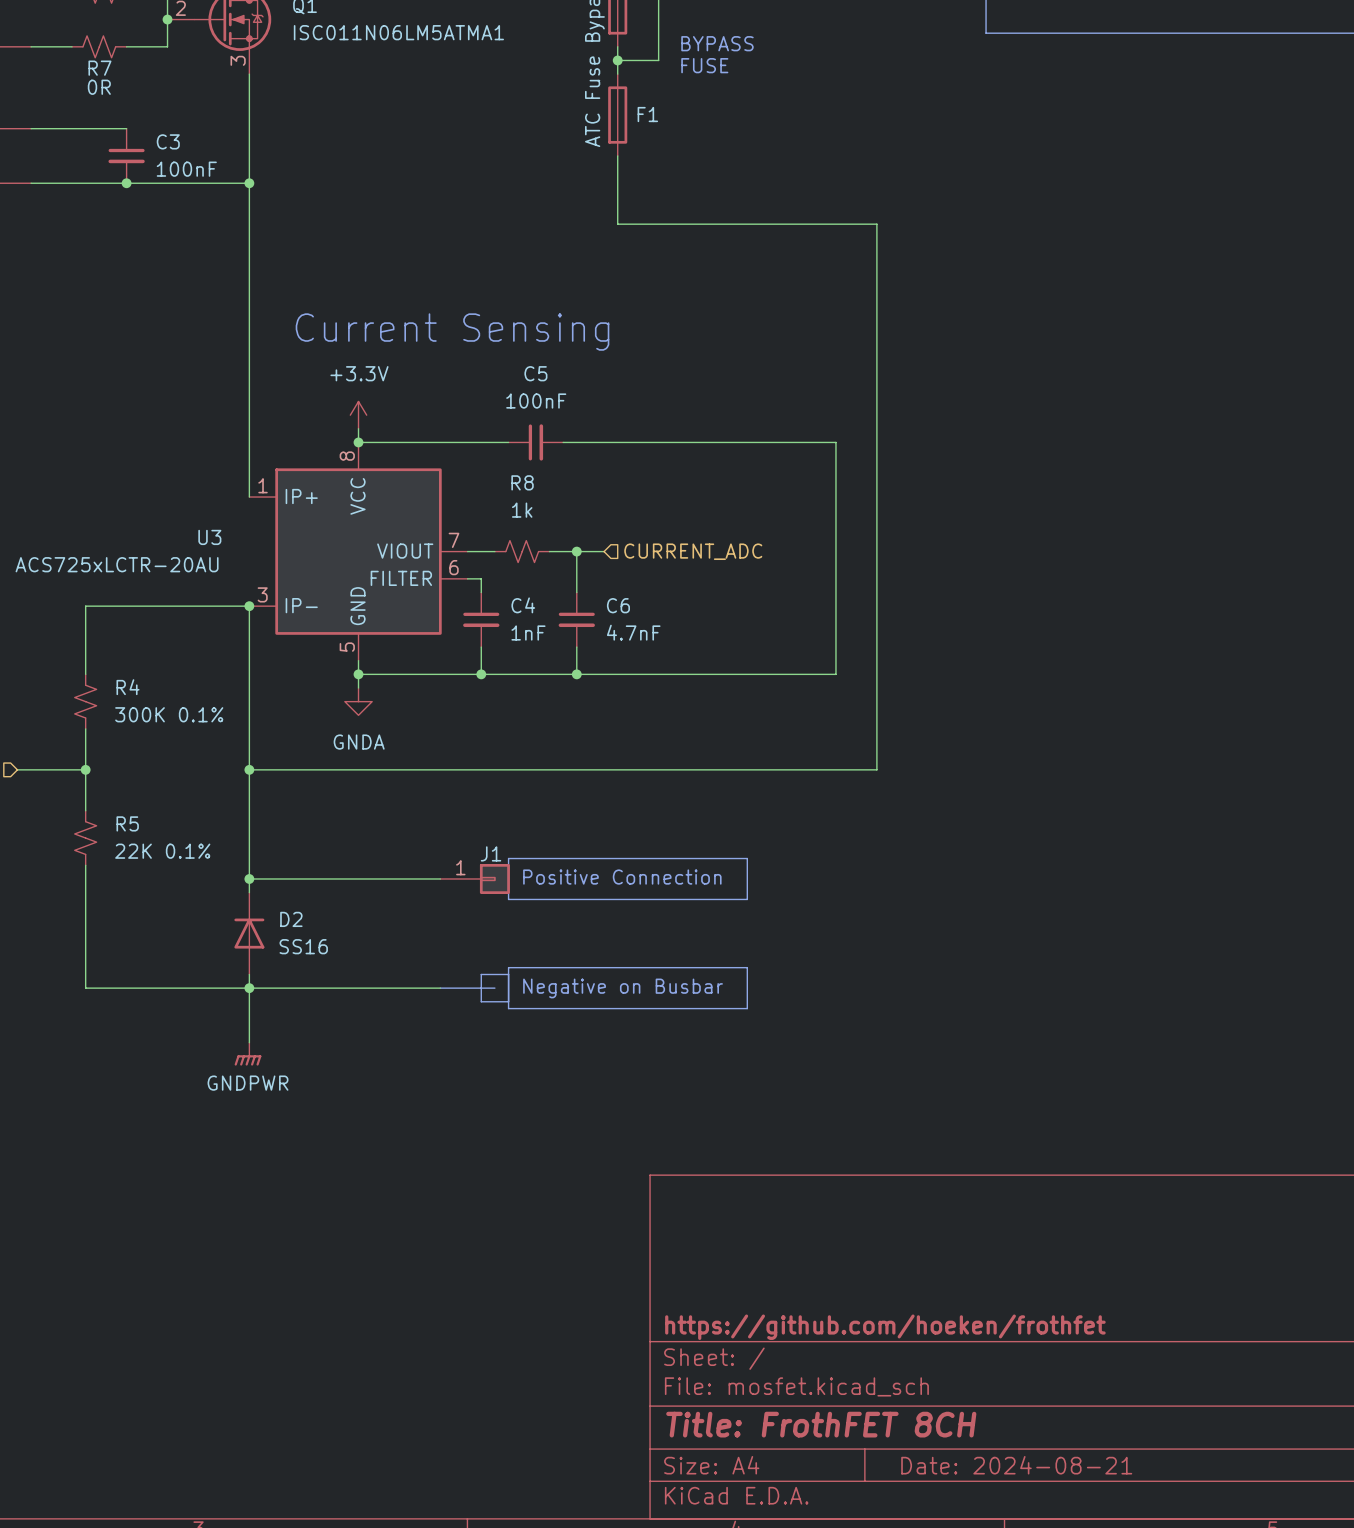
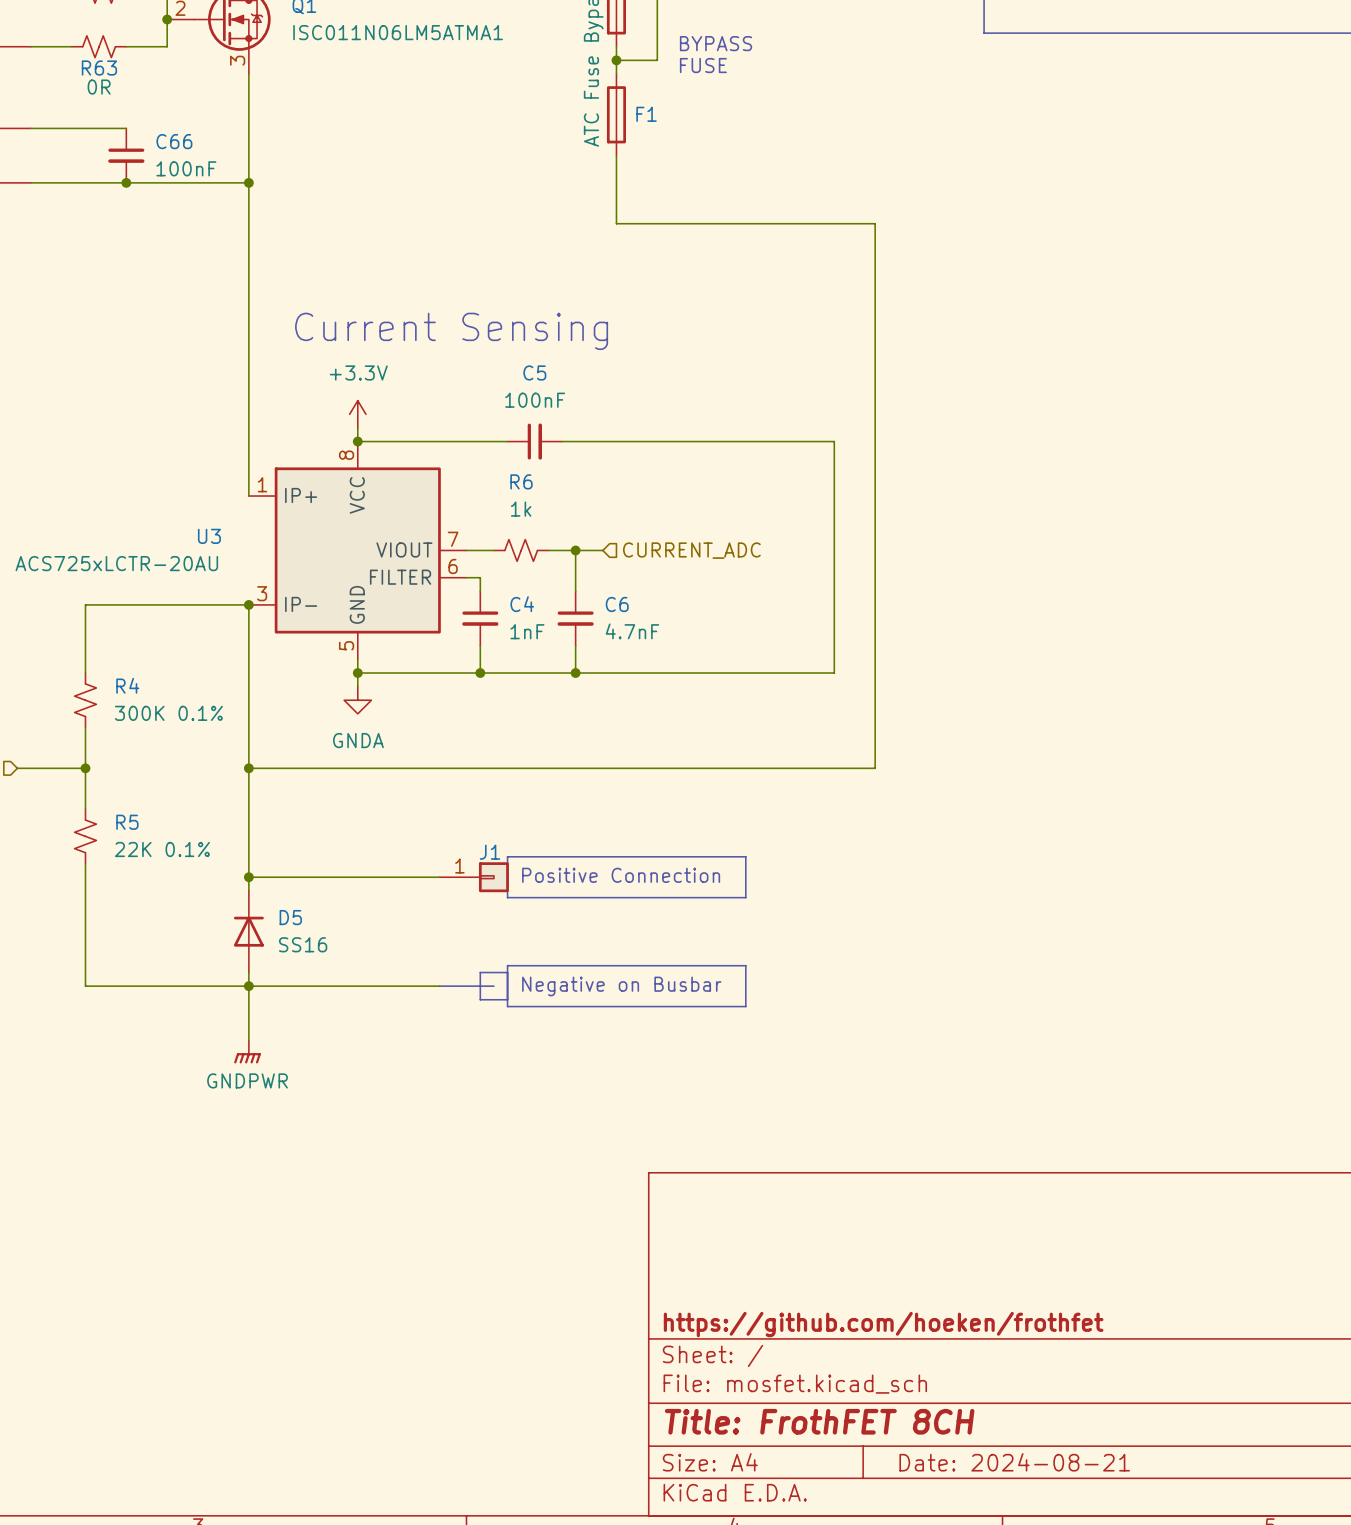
R7 name: R7 (99, 68) -> R63 (99, 68)
C3 name: C3 (168, 141) -> C66 (174, 141)
R8 name: R8 (522, 482) -> R6 (521, 481)
D2 name: D2 (291, 919) -> D5 (290, 917)

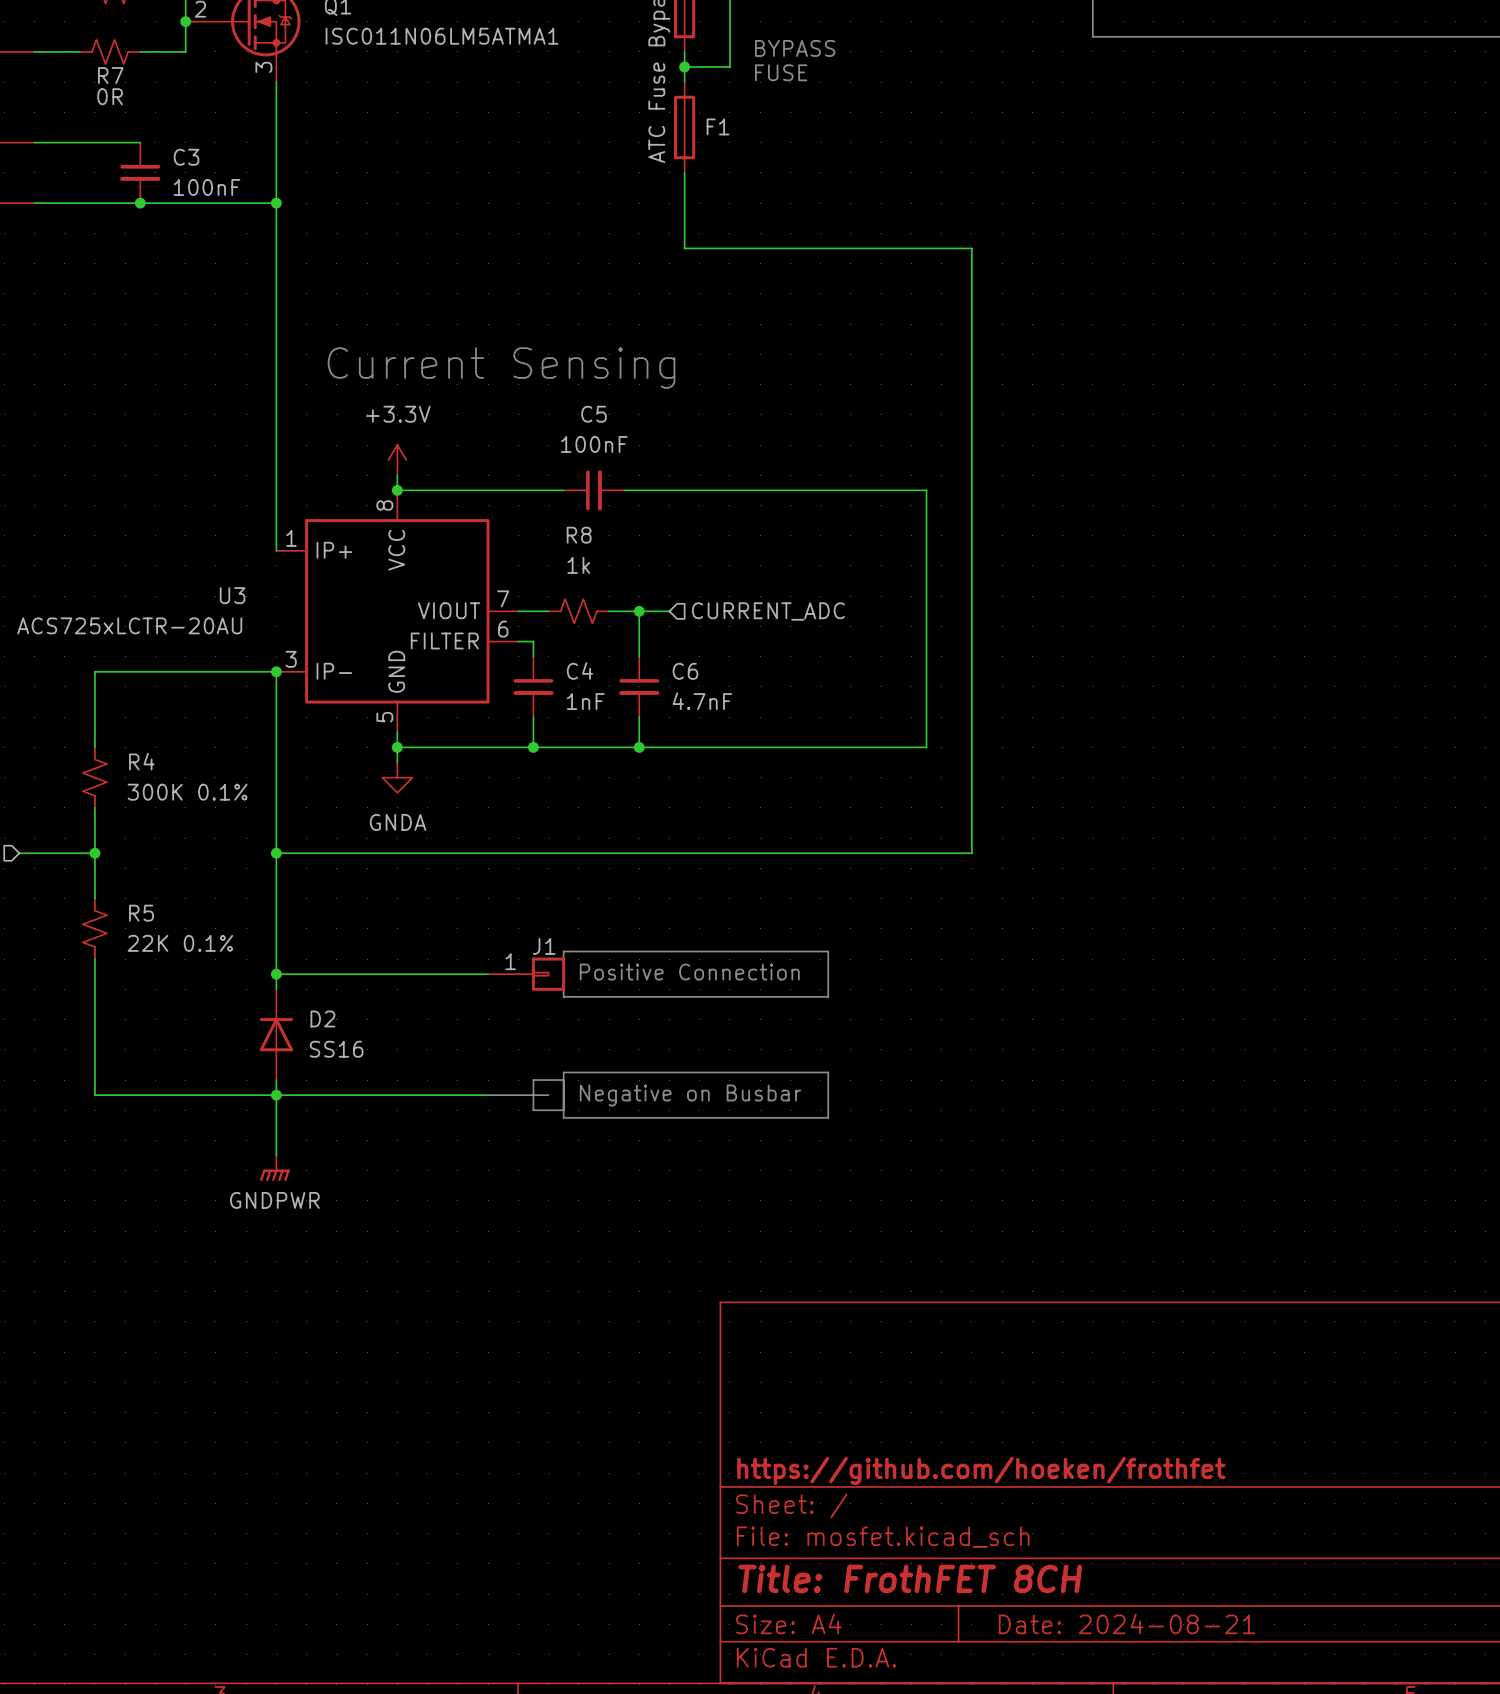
R63 name: R63 (99, 68) -> R7 (110, 75)
C66 name: C66 (174, 141) -> C3 (186, 157)
R6 name: R6 (521, 481) -> R8 (579, 535)
D5 name: D5 (290, 917) -> D2 (322, 1018)

